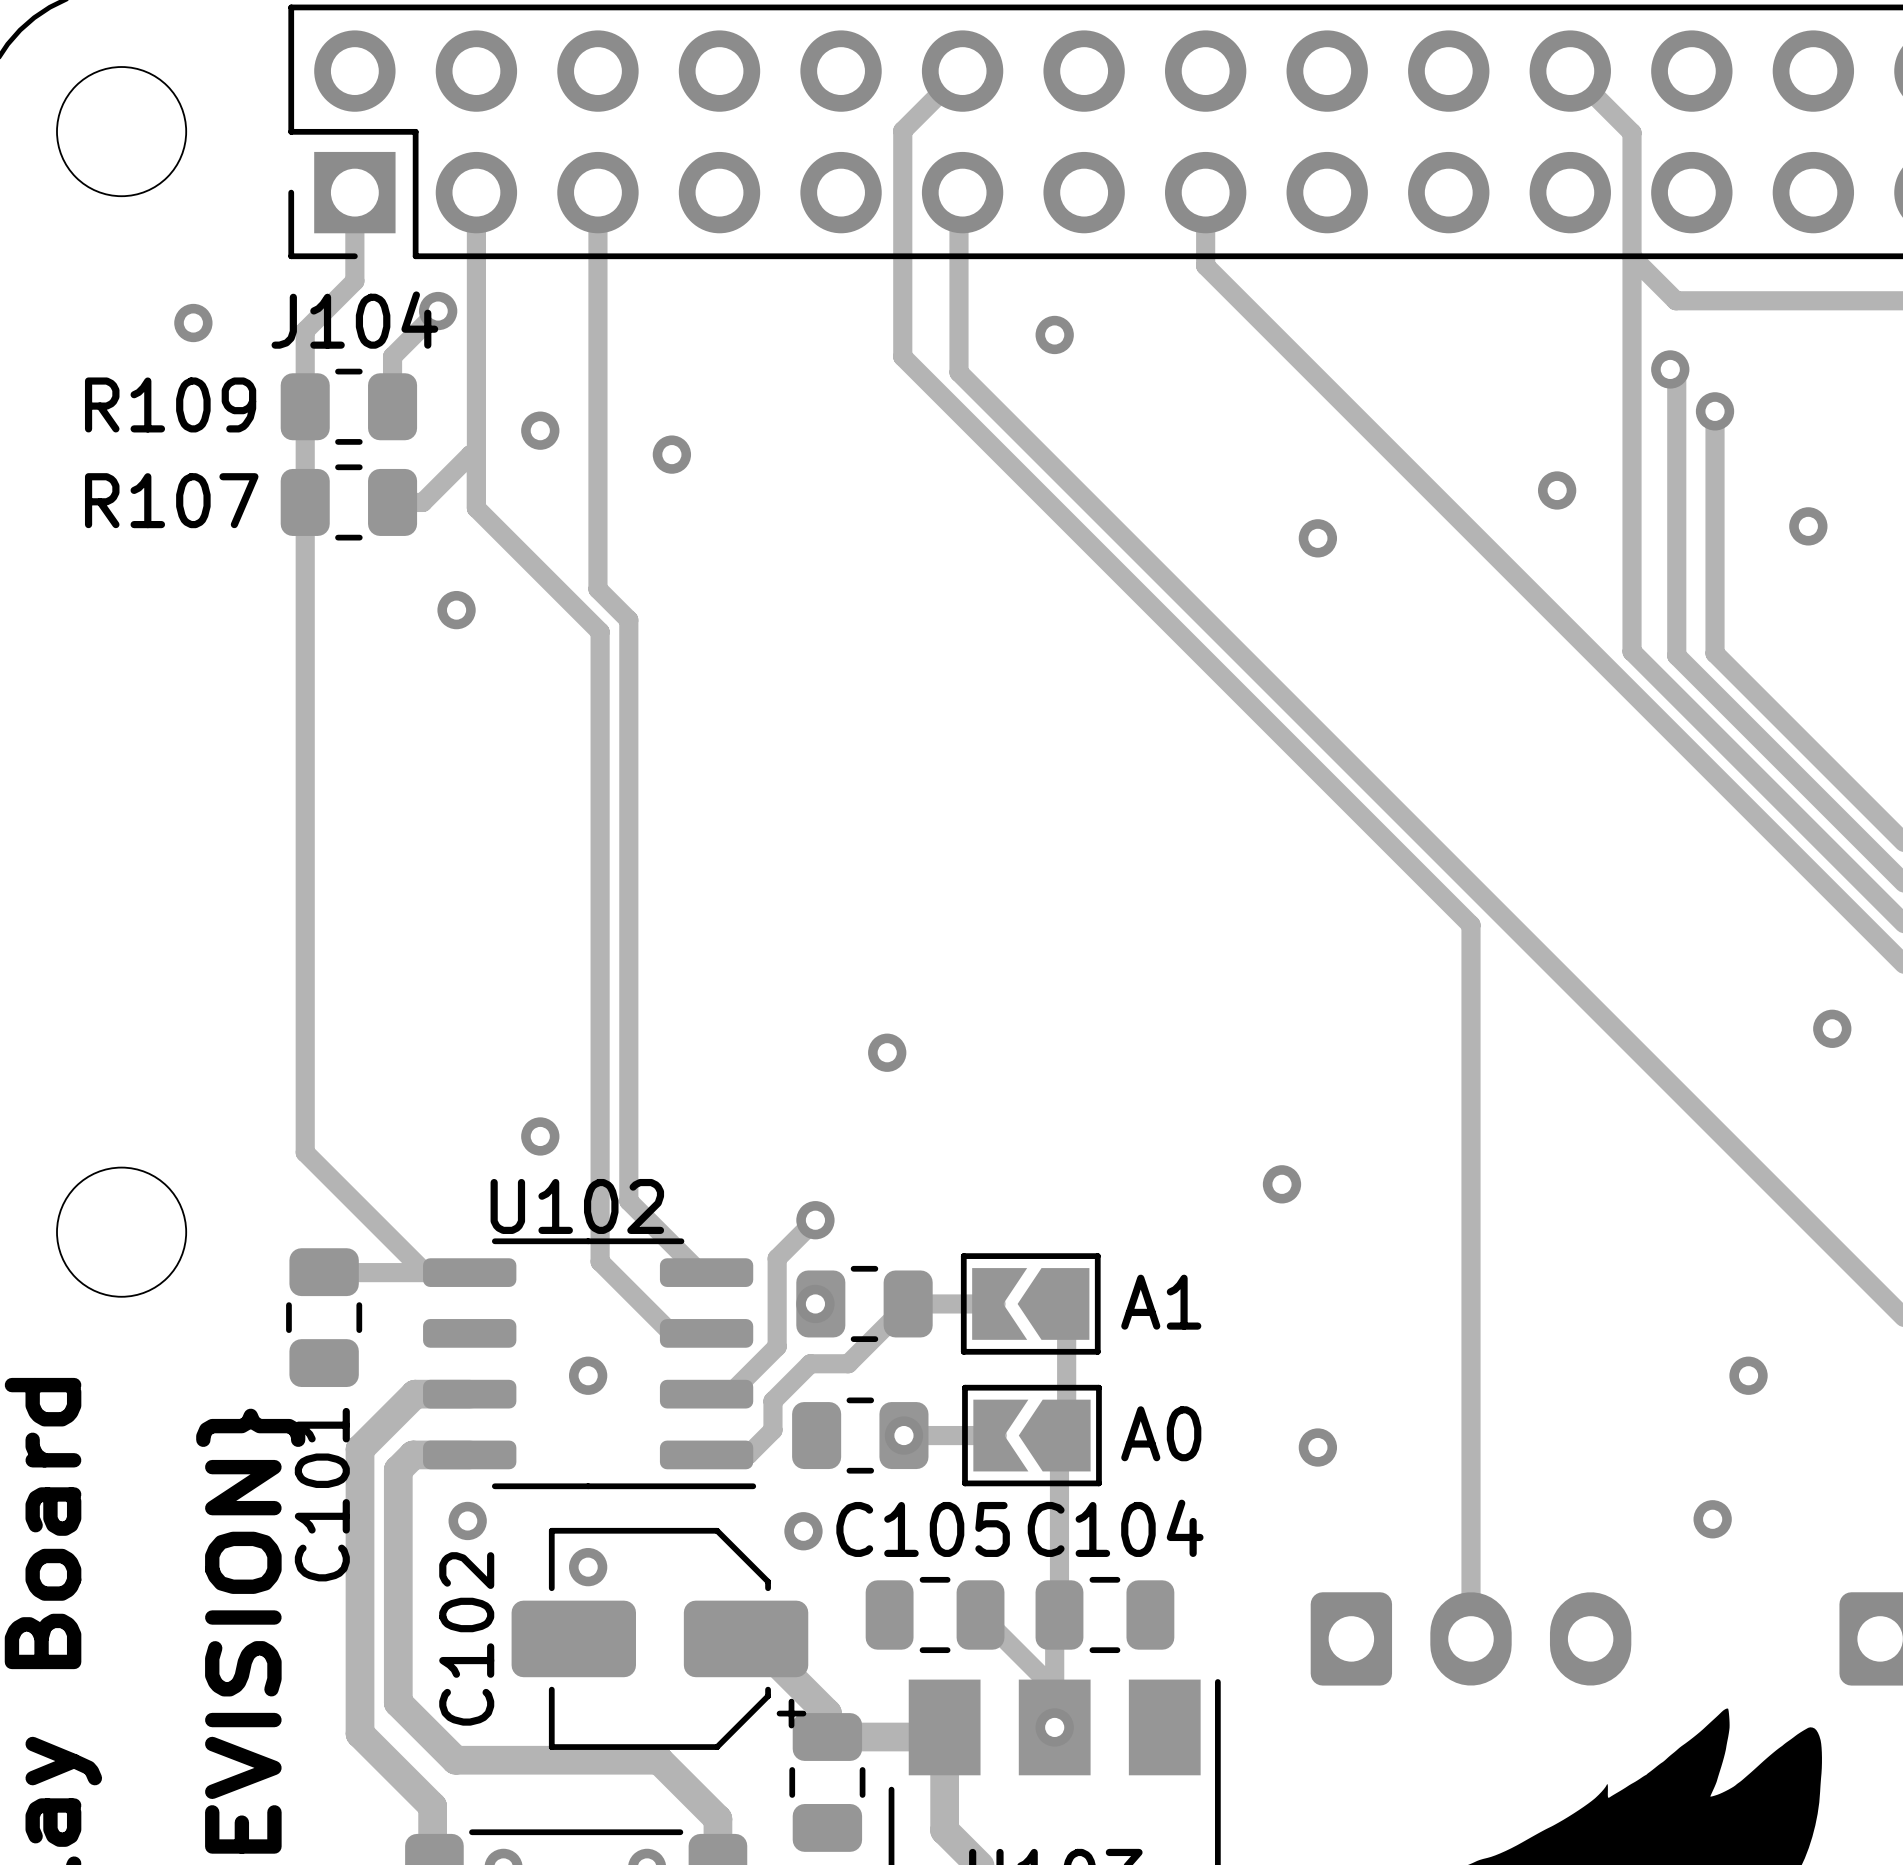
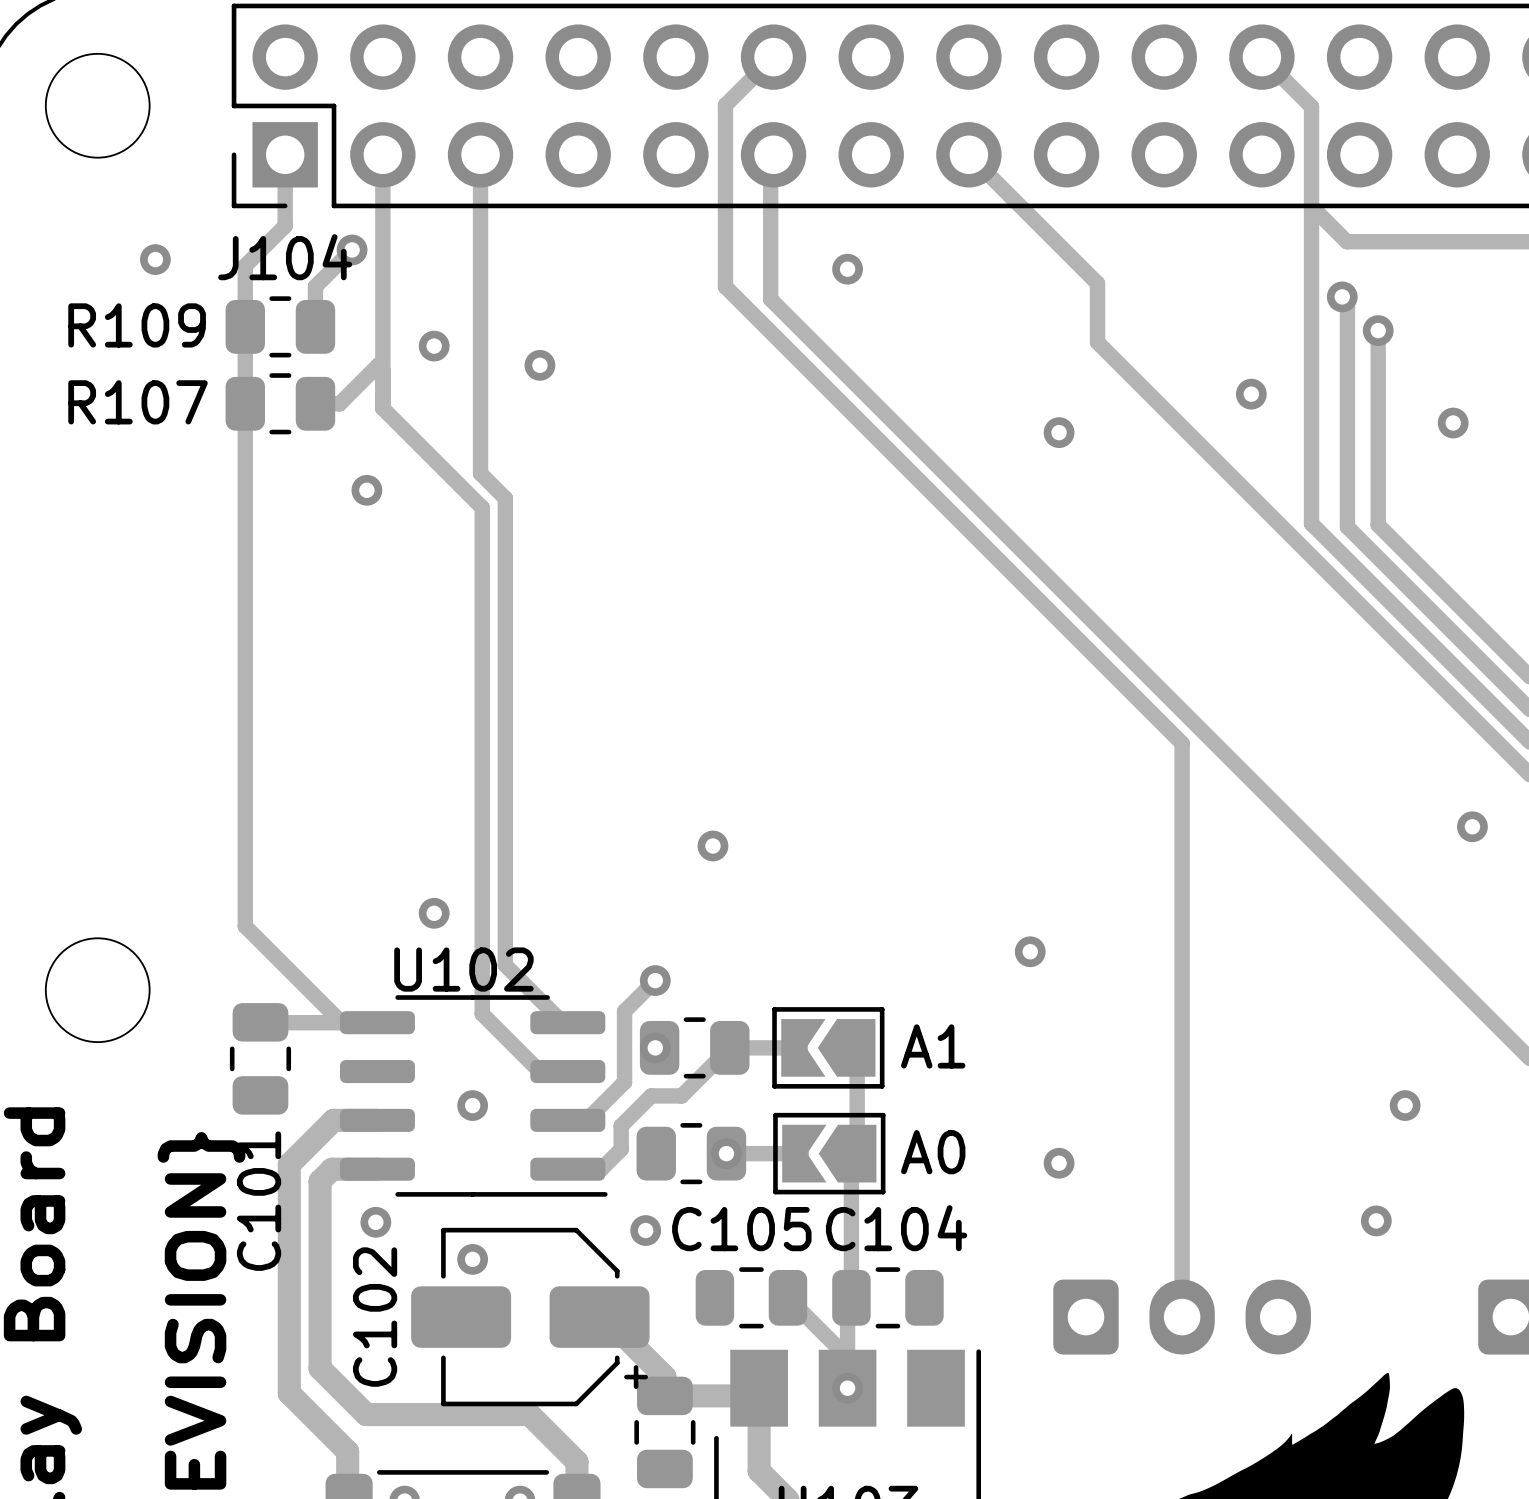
track: (1205, 192) (1205, 265) (1365, 425) -> (968, 154) (1097, 283) (1097, 342)

